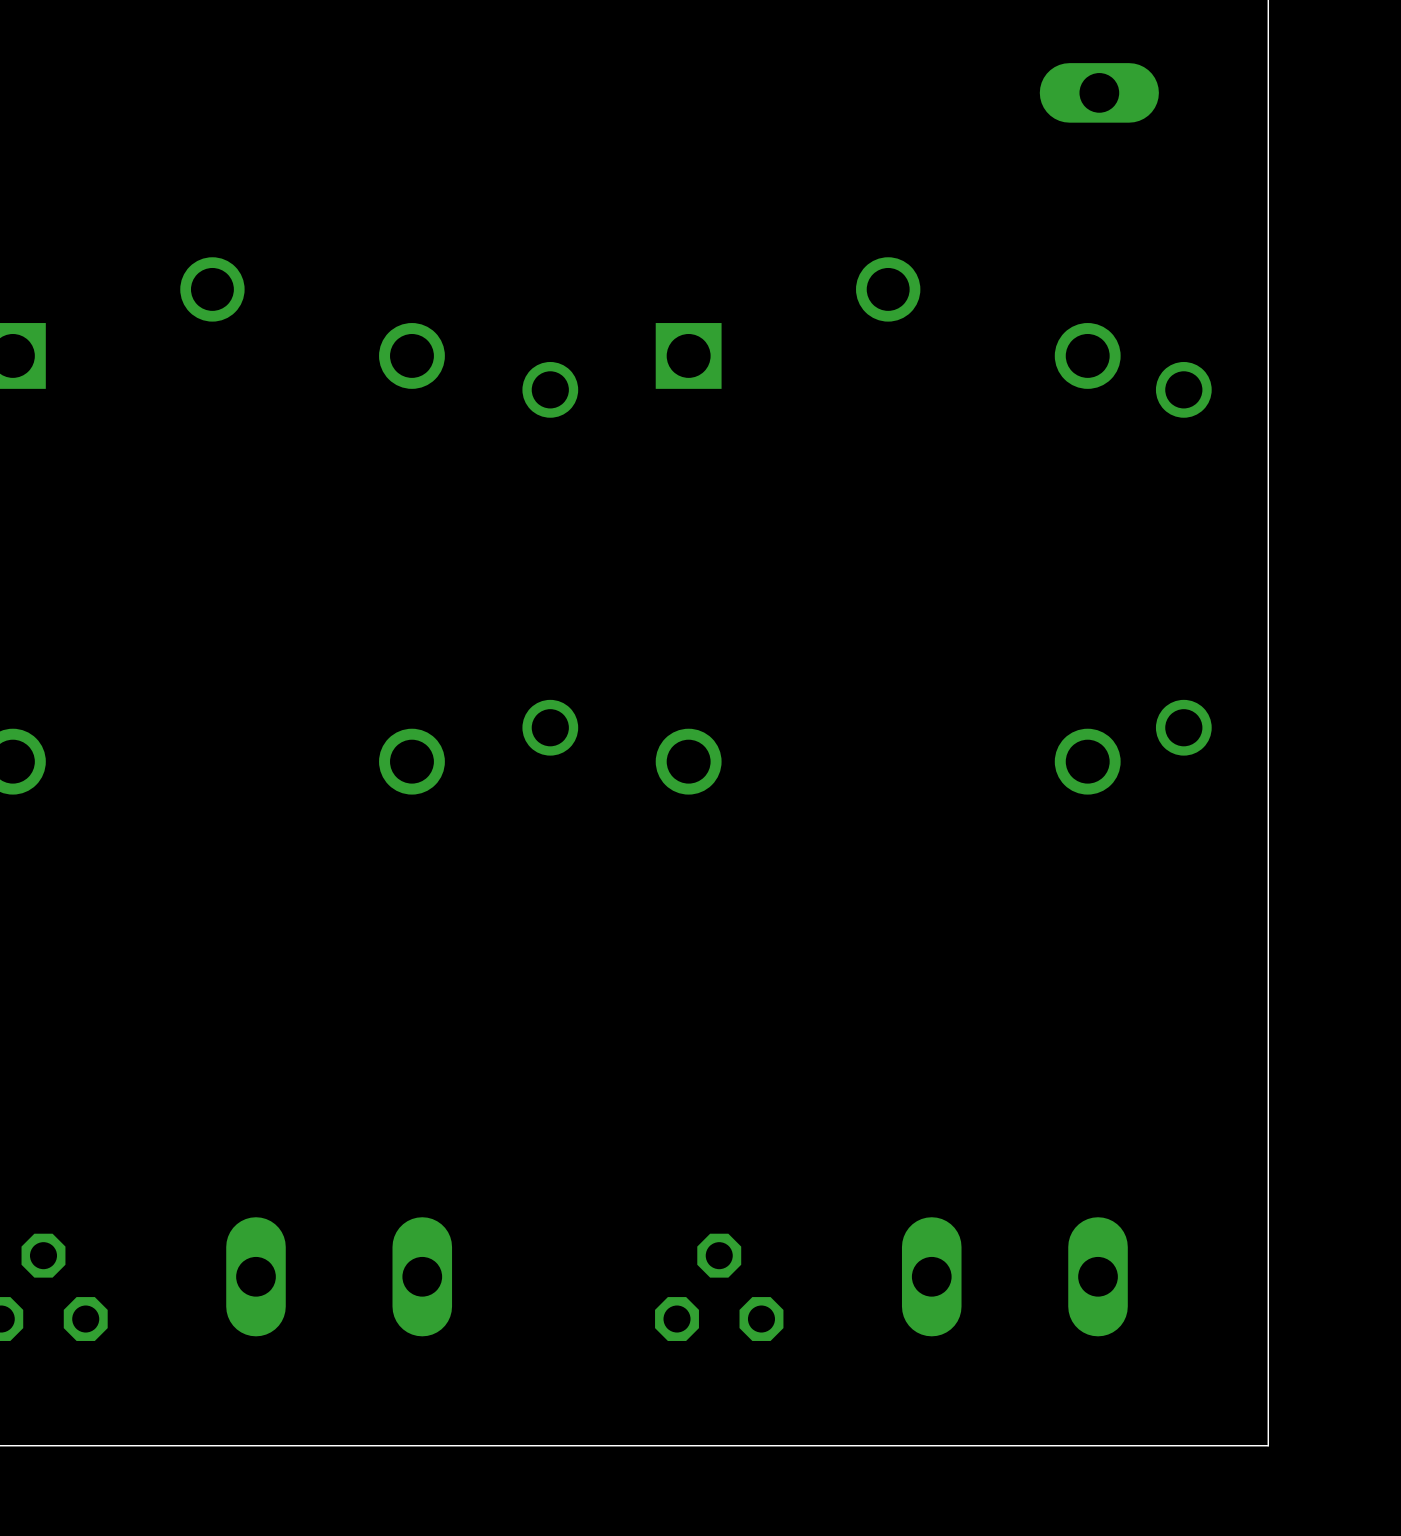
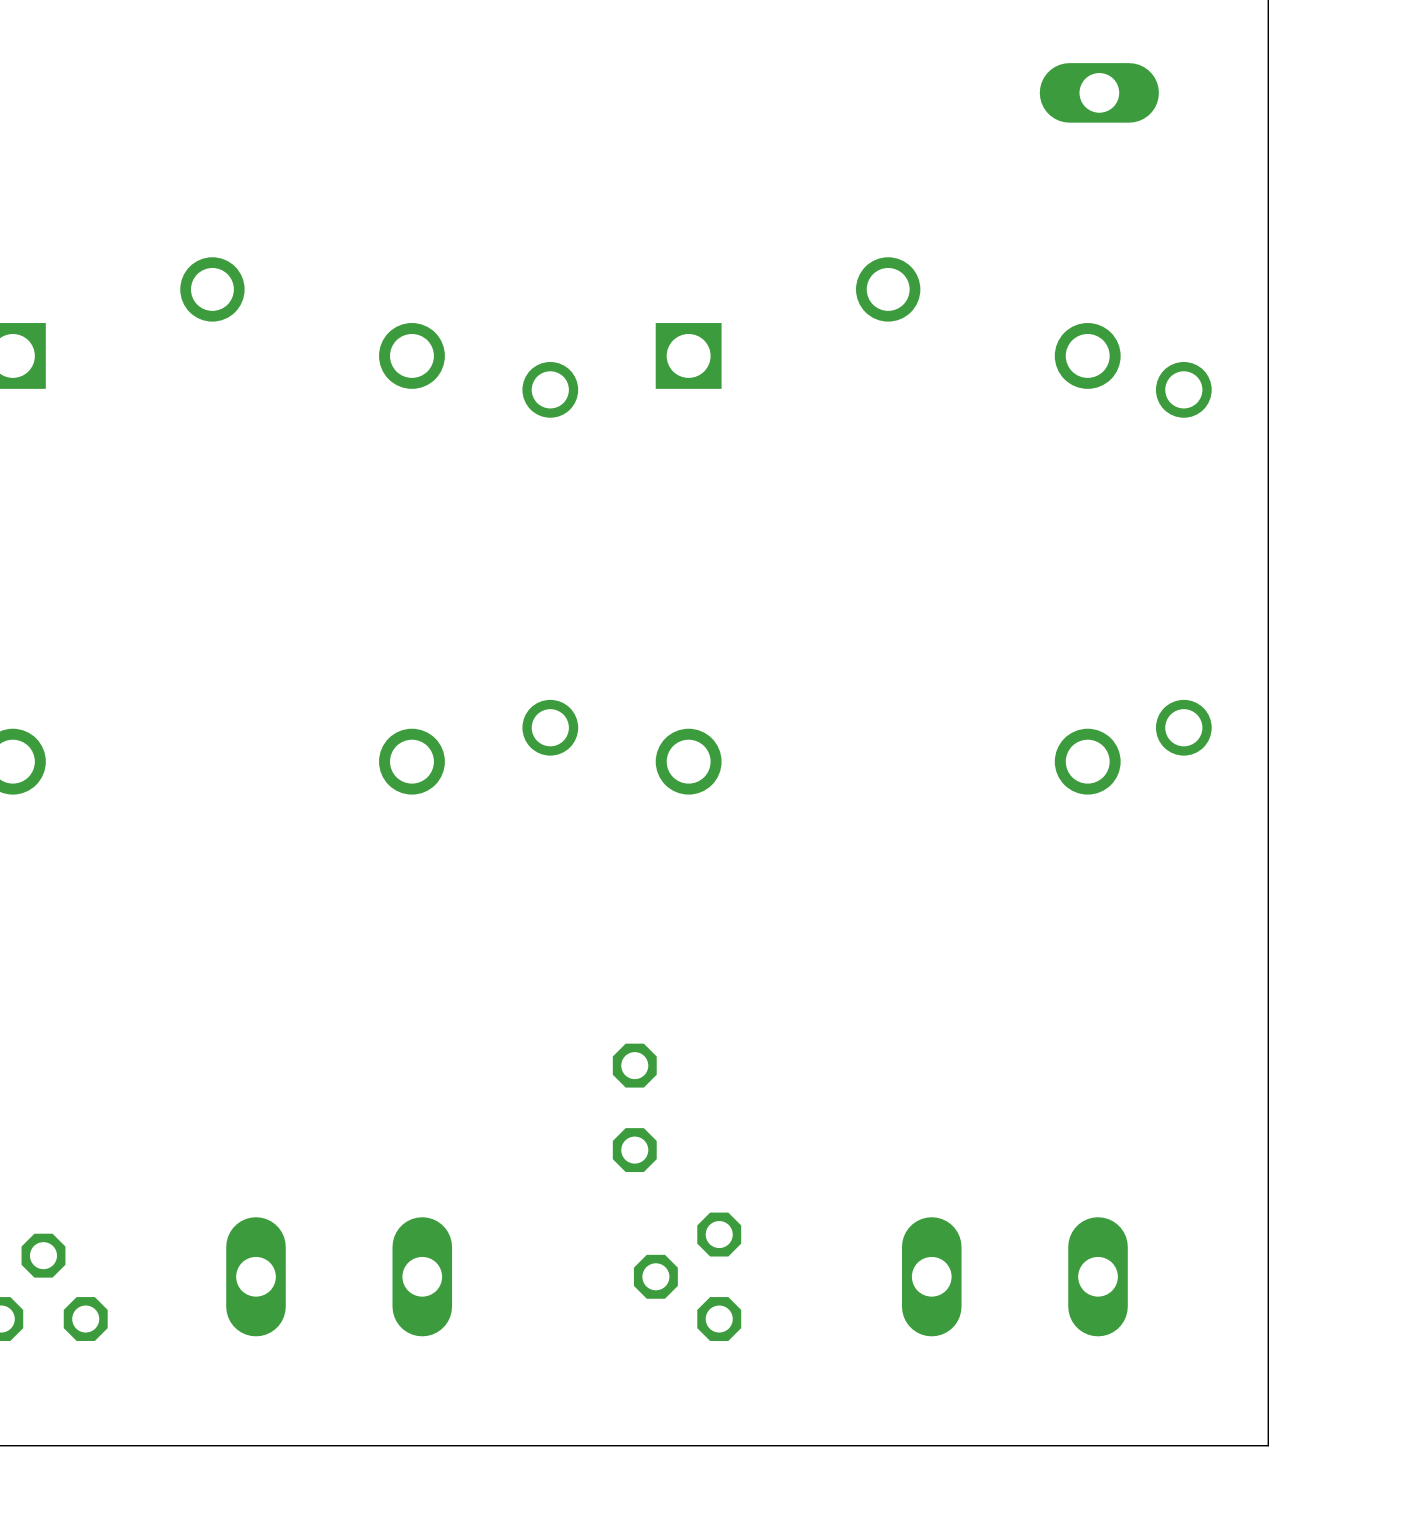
part: none -> (634, 1107)
part rotation: 0° (719, 1287) -> 90° counterclockwise (687, 1276)

